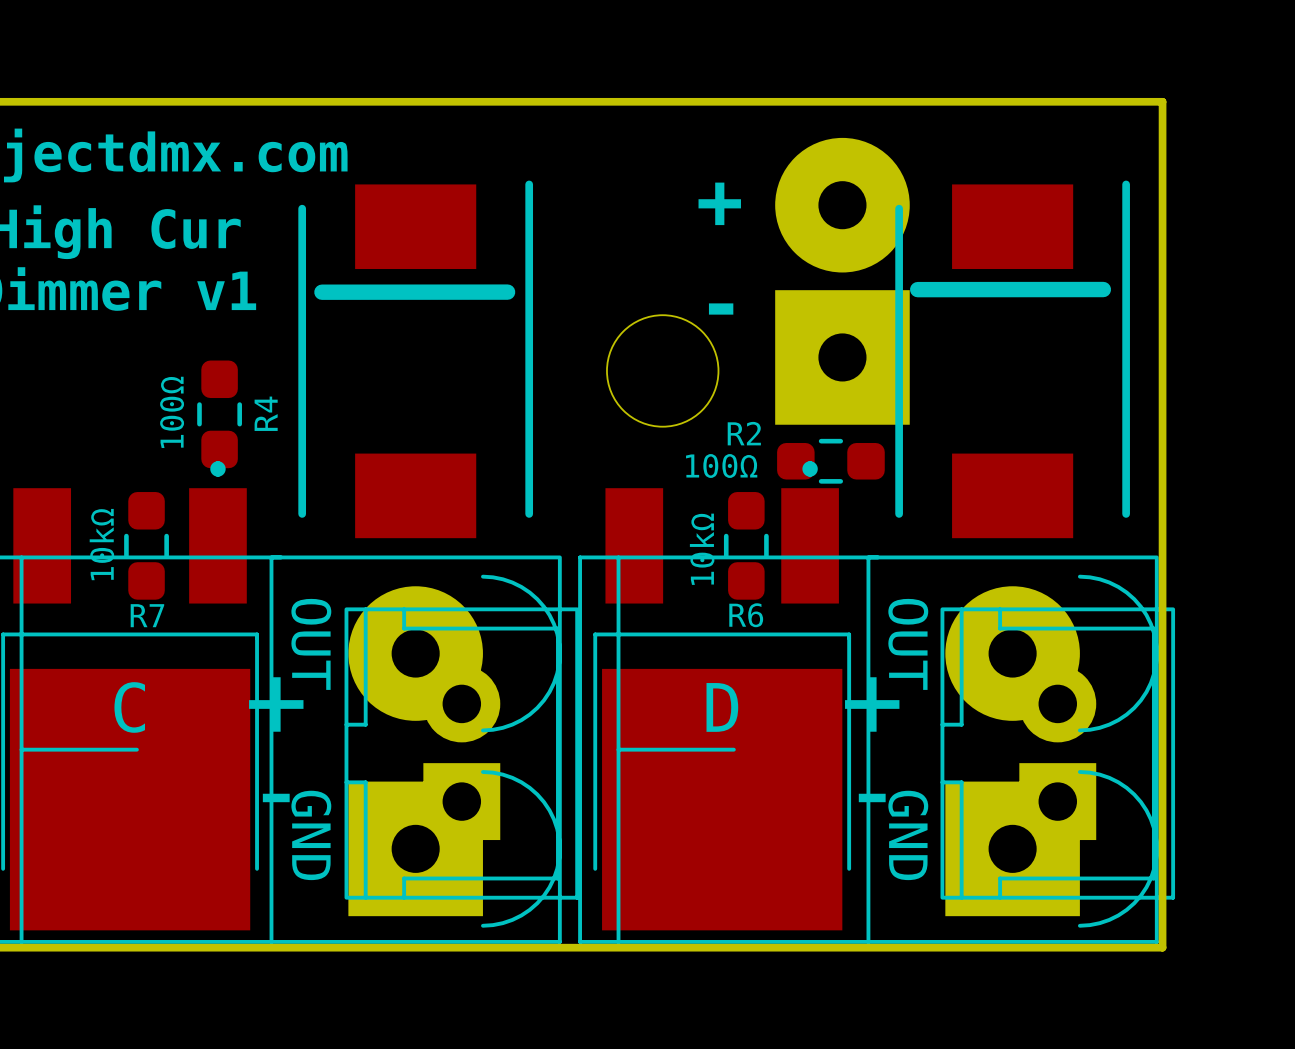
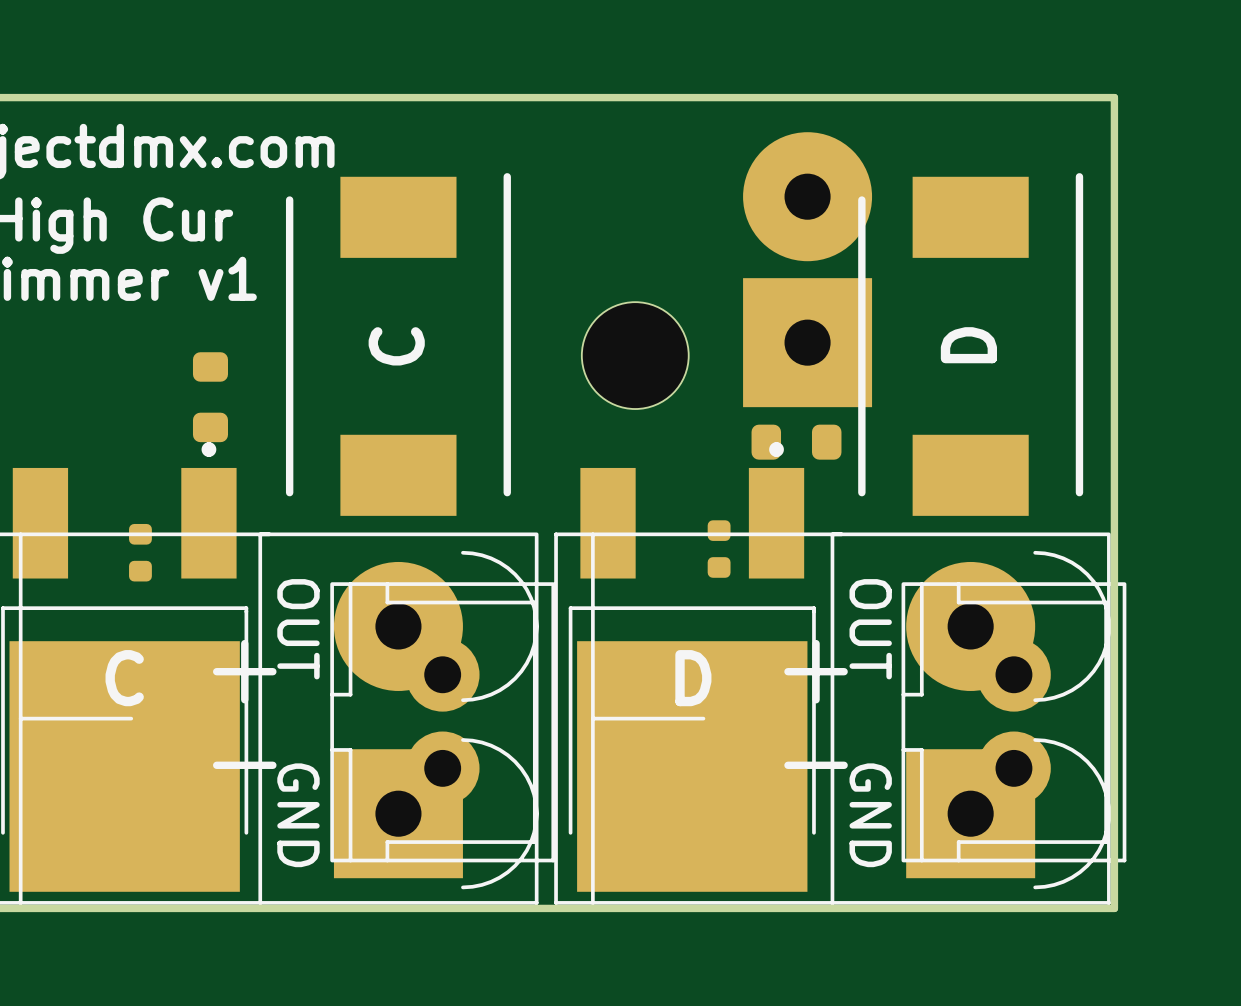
text: + (719, 203) -> none
line: (1103, 289) (917, 289) -> none
line: (321, 292) (507, 292) -> none
text: - (721, 309) -> none
C name: none -> C (396, 346)
D name: none -> D (968, 345)
R4: 100Ω (219, 414) -> none
part: none -> (210, 397)
R2: 100Ω (830, 461) -> none
part: none -> (796, 442)
R7: 10kΩ (146, 545) -> none
R6: 10kΩ (746, 545) -> none
part: none -> (719, 549)
part: none -> (140, 552)
part footprint: [344, 607, 580, 900] -> [330, 582, 556, 863]
part footprint: [940, 607, 1176, 900] -> [901, 582, 1127, 863]

